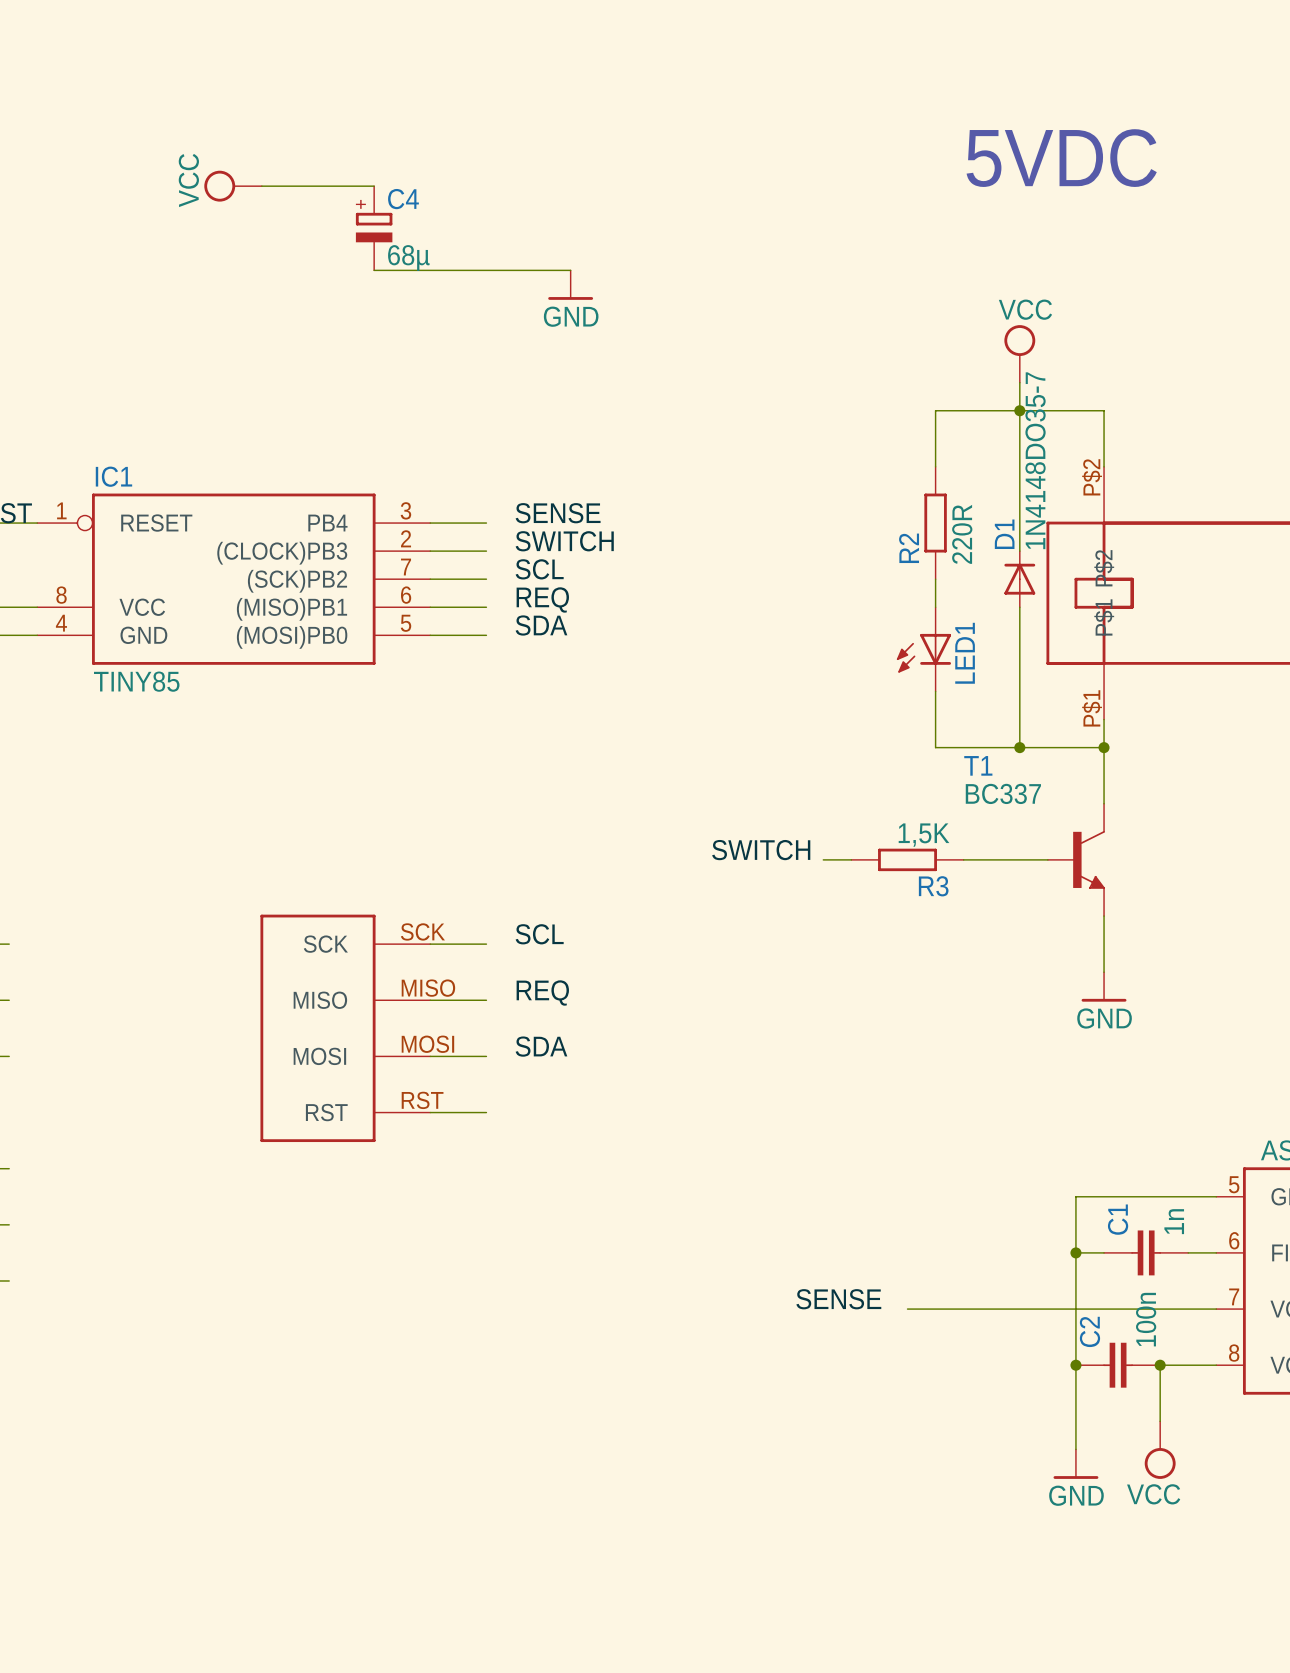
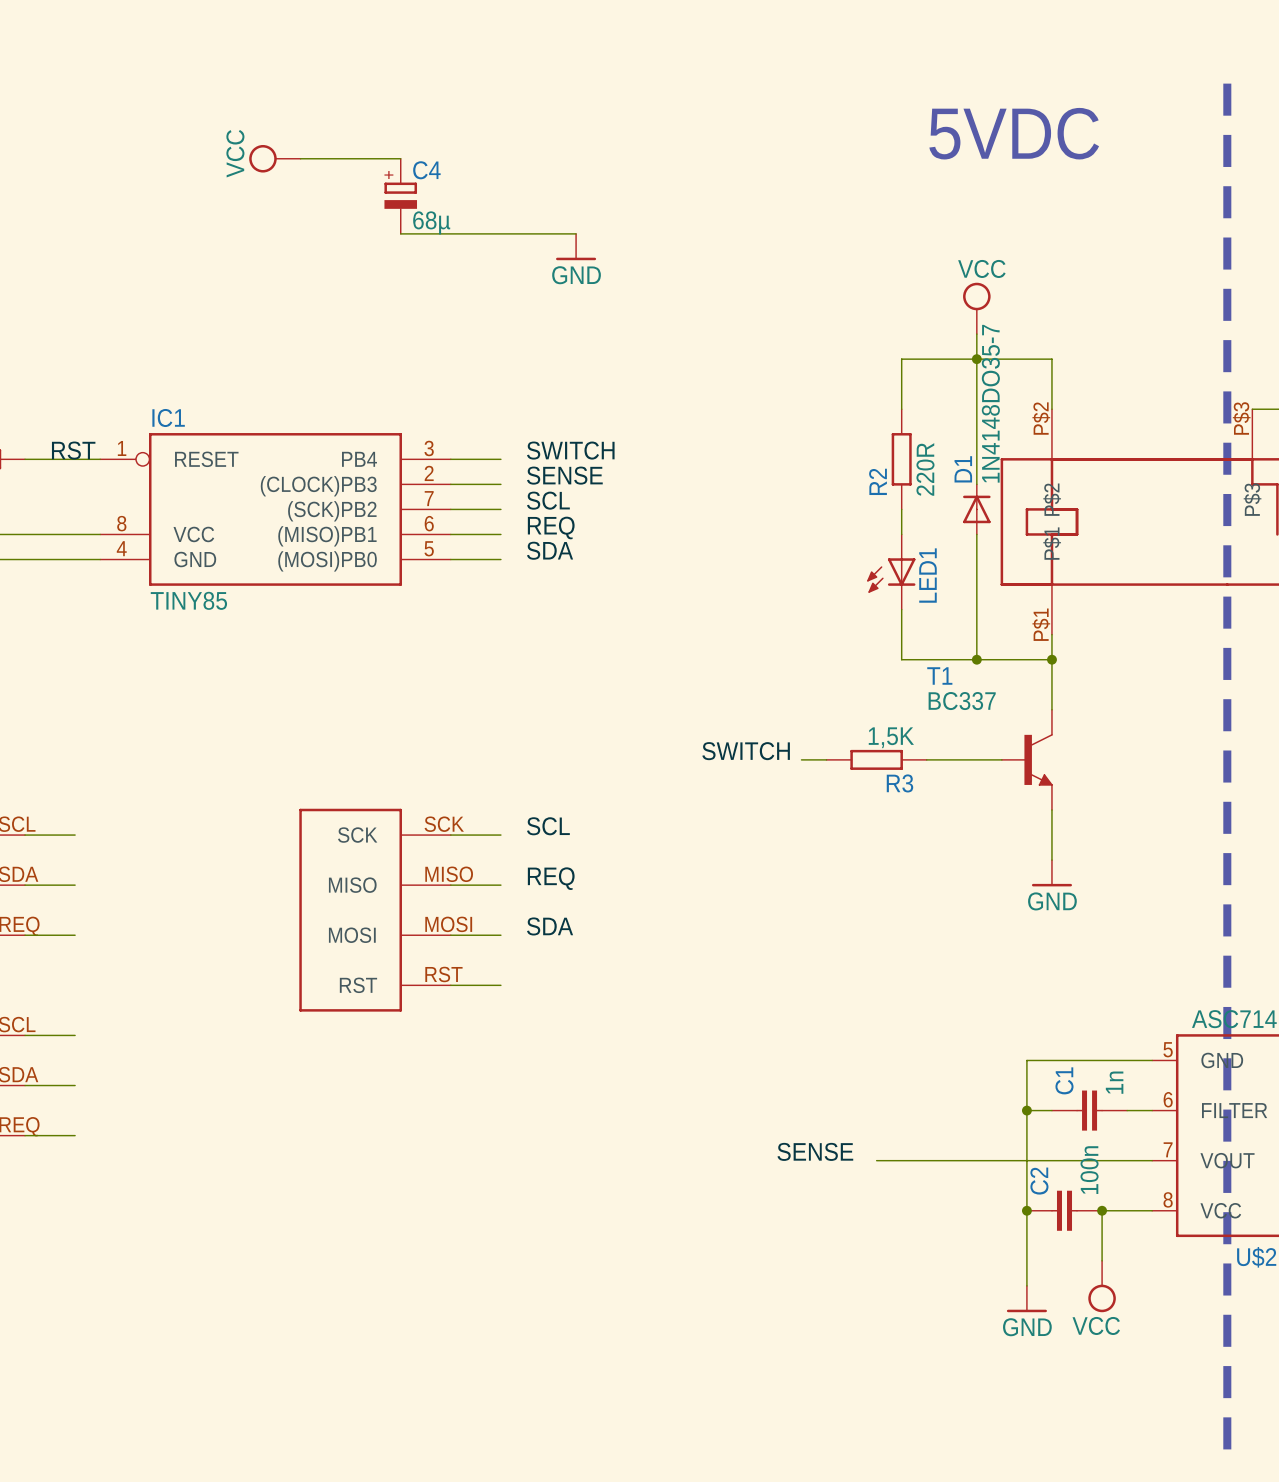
label: SENSE (558, 513) -> SWITCH (570, 450)
label: SWITCH (564, 541) -> SENSE (564, 475)

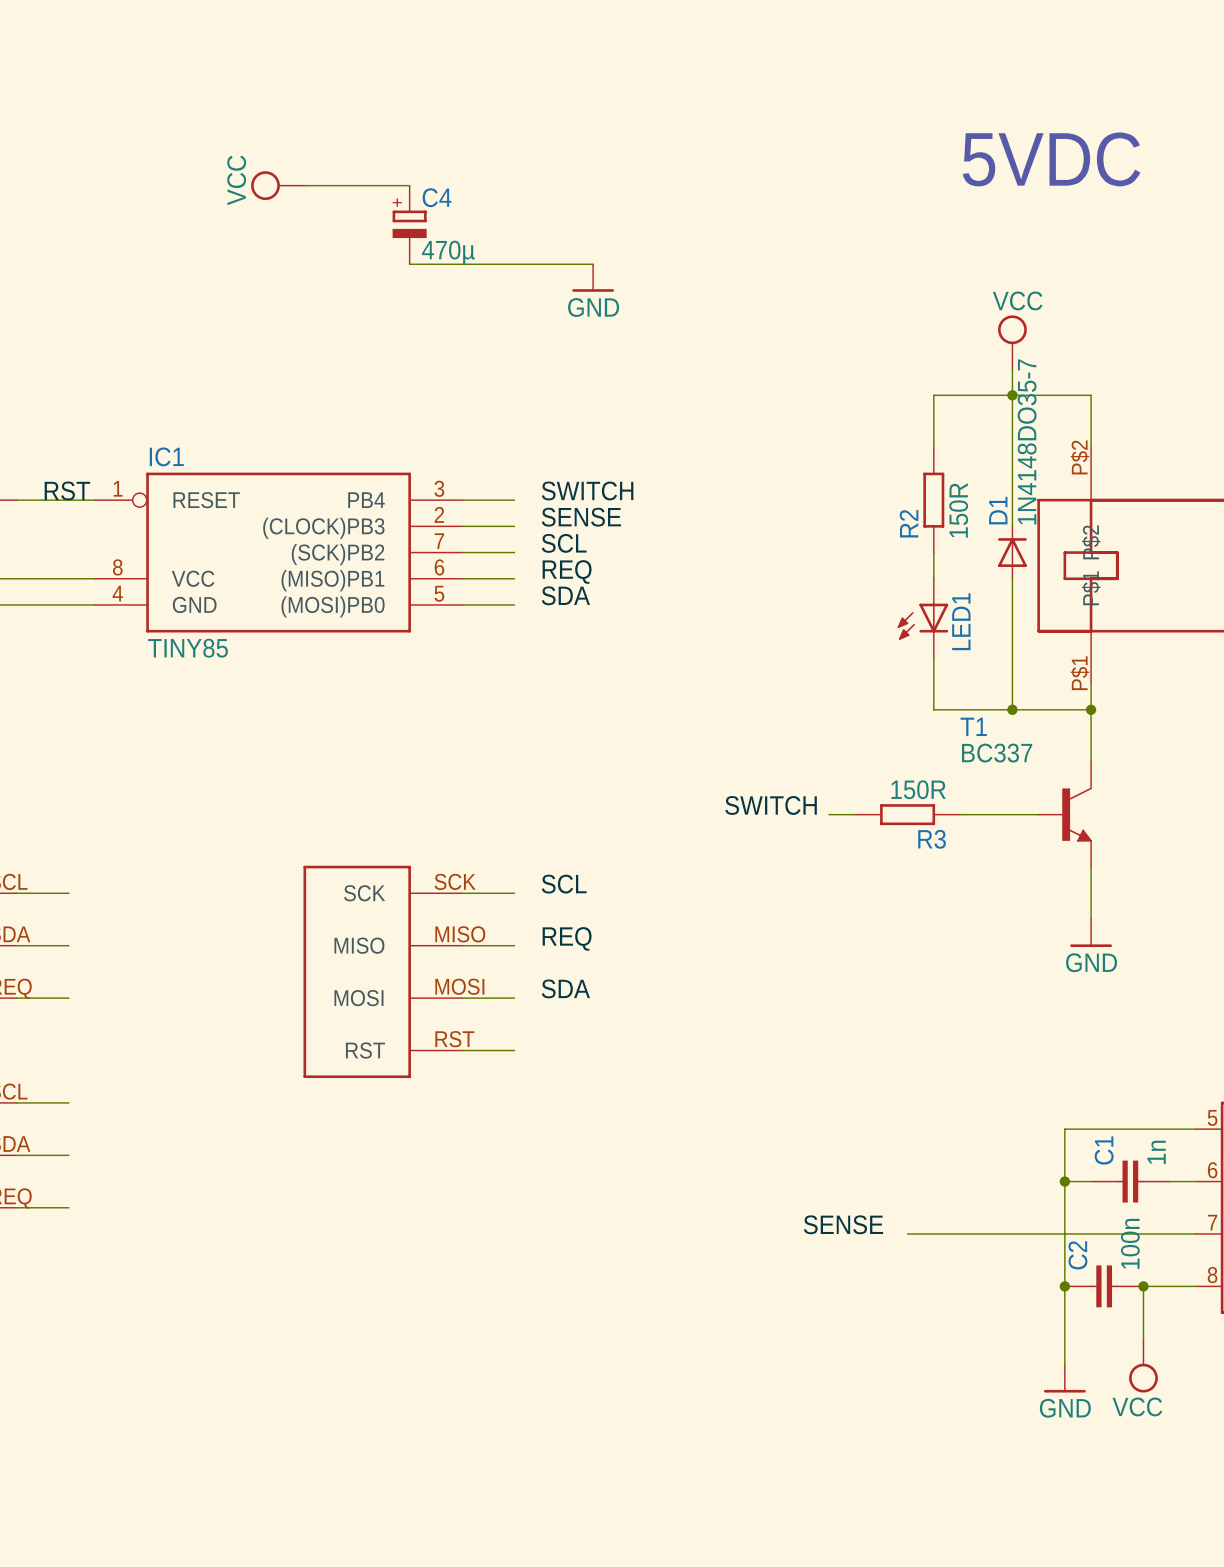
C4 value: 68µ (431, 222) -> 470µ (448, 252)
R2 value: 220R (925, 469) -> 150R (958, 510)
R3 value: 1,5K (891, 737) -> 150R (918, 789)

